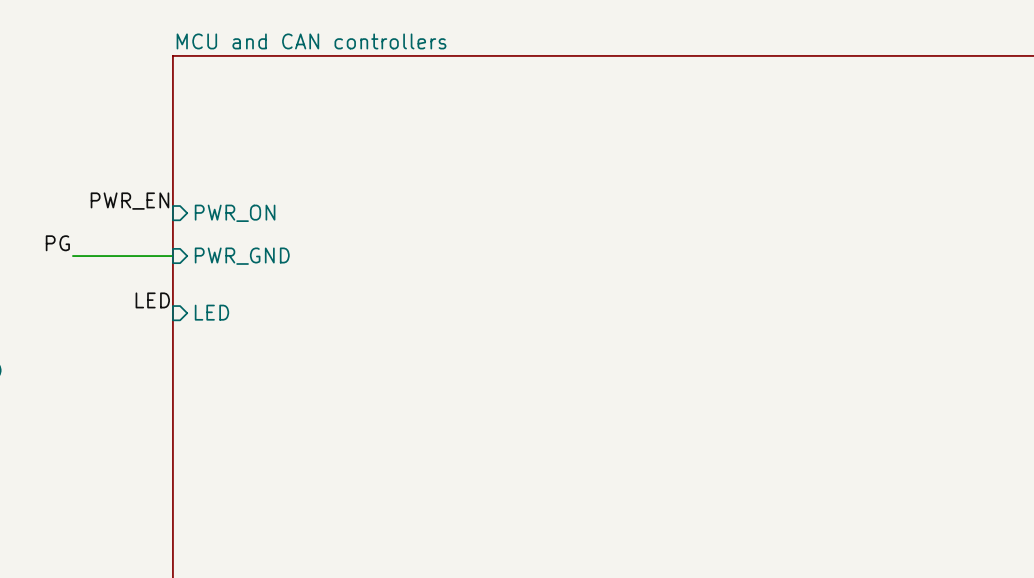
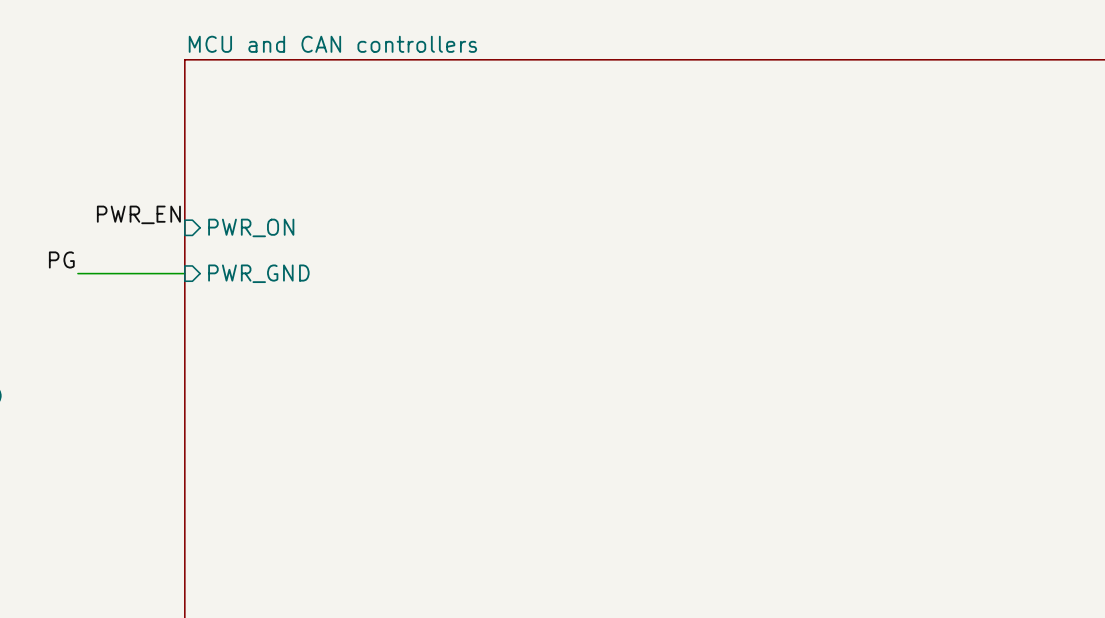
label: LED (152, 300) -> none
sheet pin: LED (211, 312) -> none

